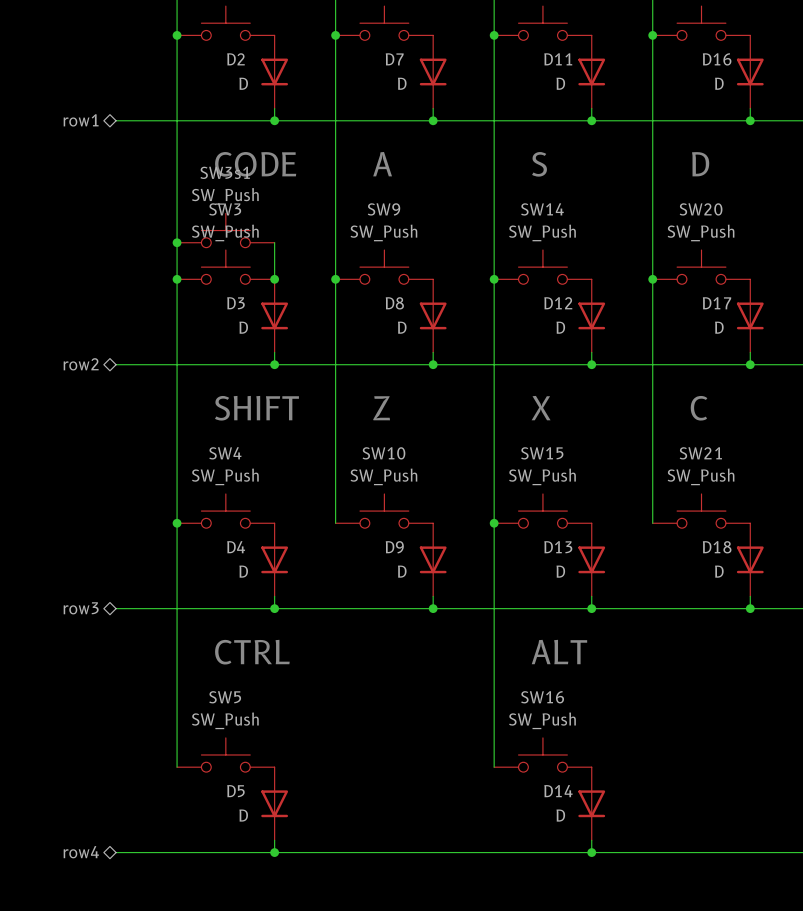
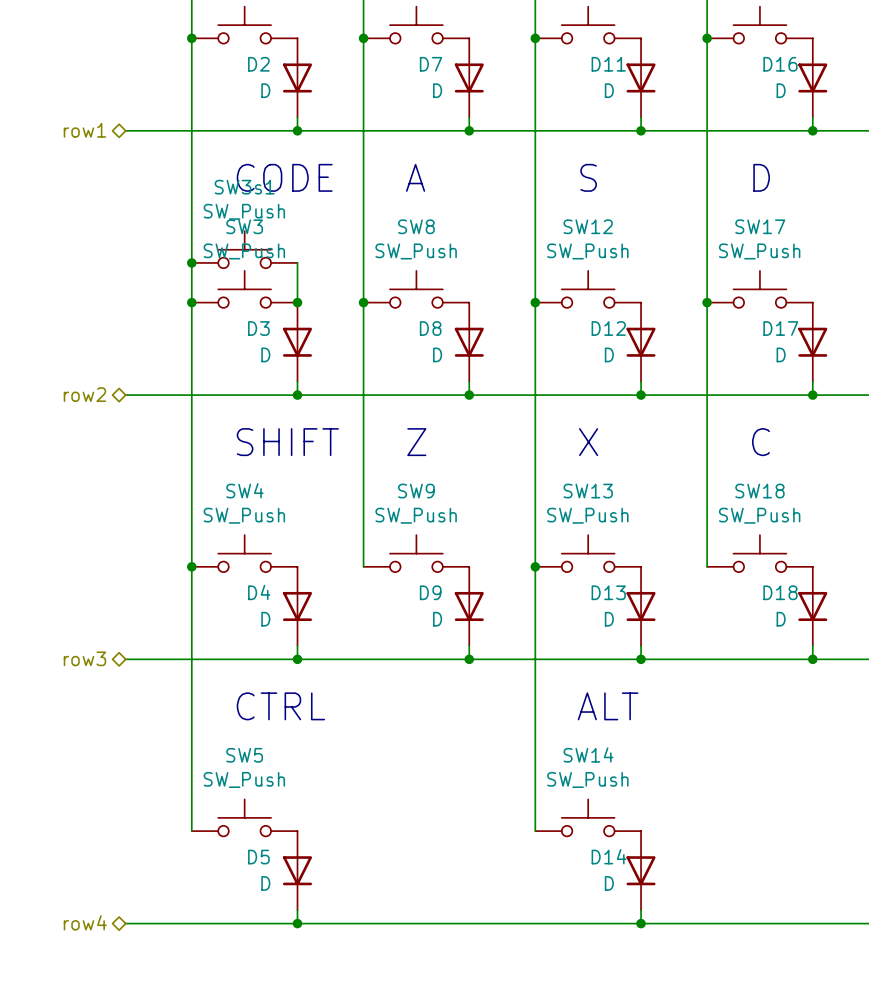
SW9 name: SW9 (384, 209) -> SW8 (416, 226)
SW14 name: SW14 (542, 209) -> SW12 (588, 226)
SW20 name: SW20 (701, 209) -> SW17 (760, 226)
SW10 name: SW10 (383, 453) -> SW9 (416, 491)
SW15 name: SW15 (542, 453) -> SW13 (588, 491)
SW21 name: SW21 (700, 453) -> SW18 (759, 491)
SW16 name: SW16 (542, 697) -> SW14 (588, 754)

